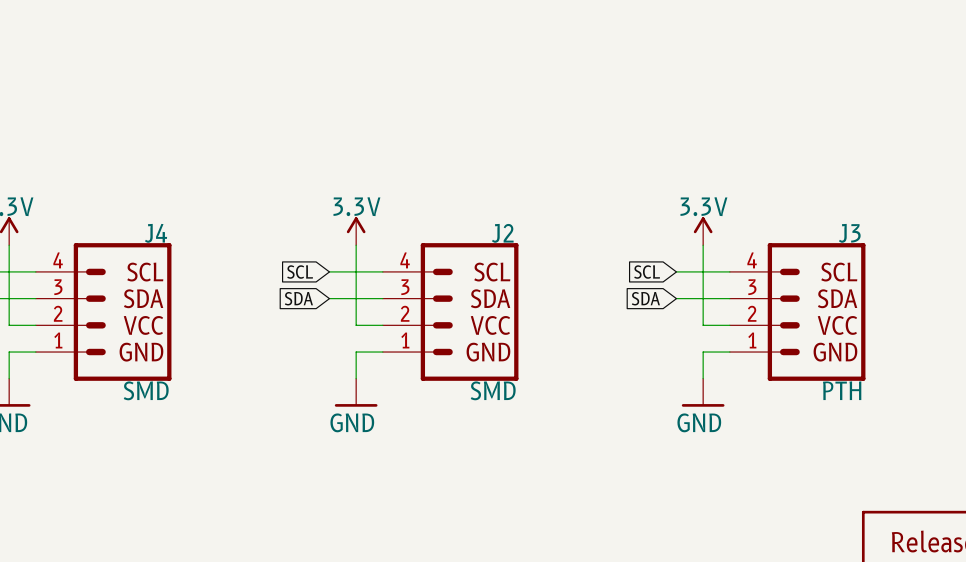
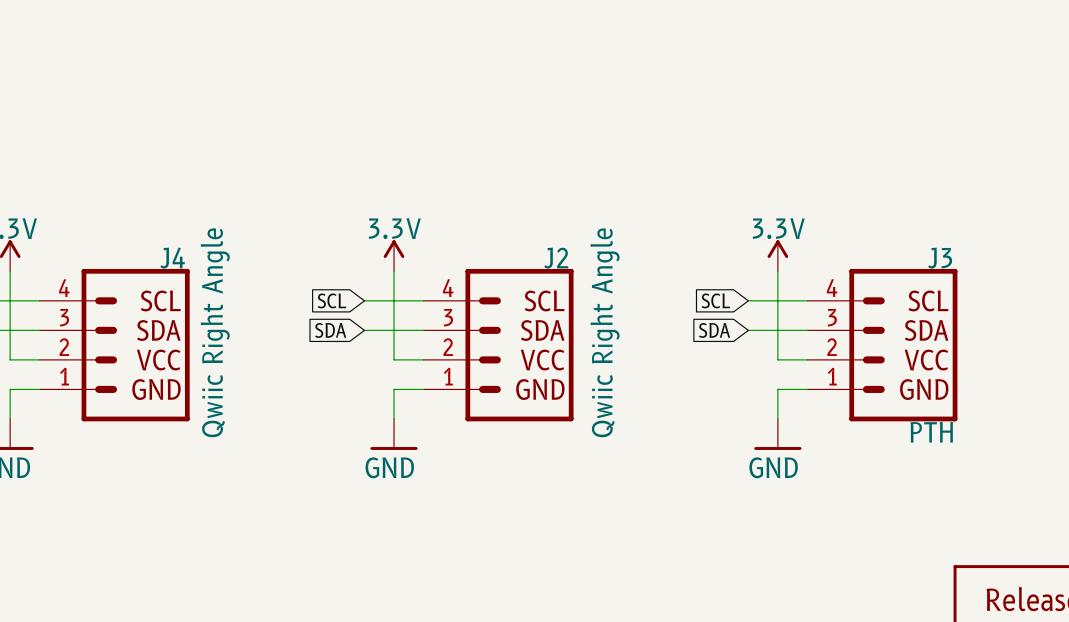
J4 value: SMD (146, 390) -> Qwiic Right Angle (215, 332)
J2 value: SMD (493, 390) -> Qwiic Right Angle (605, 332)

